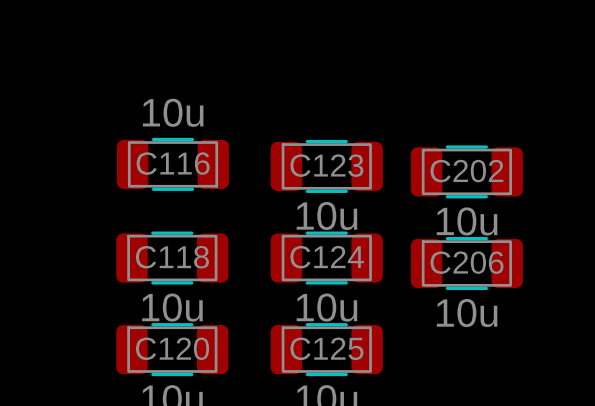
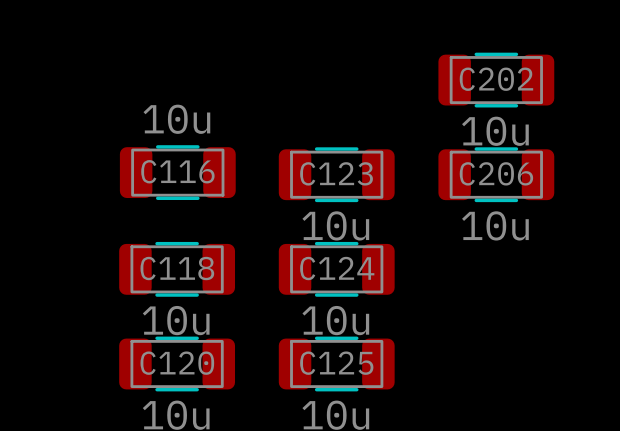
C202 position: (466, 171) -> (496, 80)
C206 position: (466, 263) -> (496, 174)

